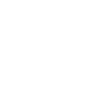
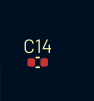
C14: none -> (37, 62)

